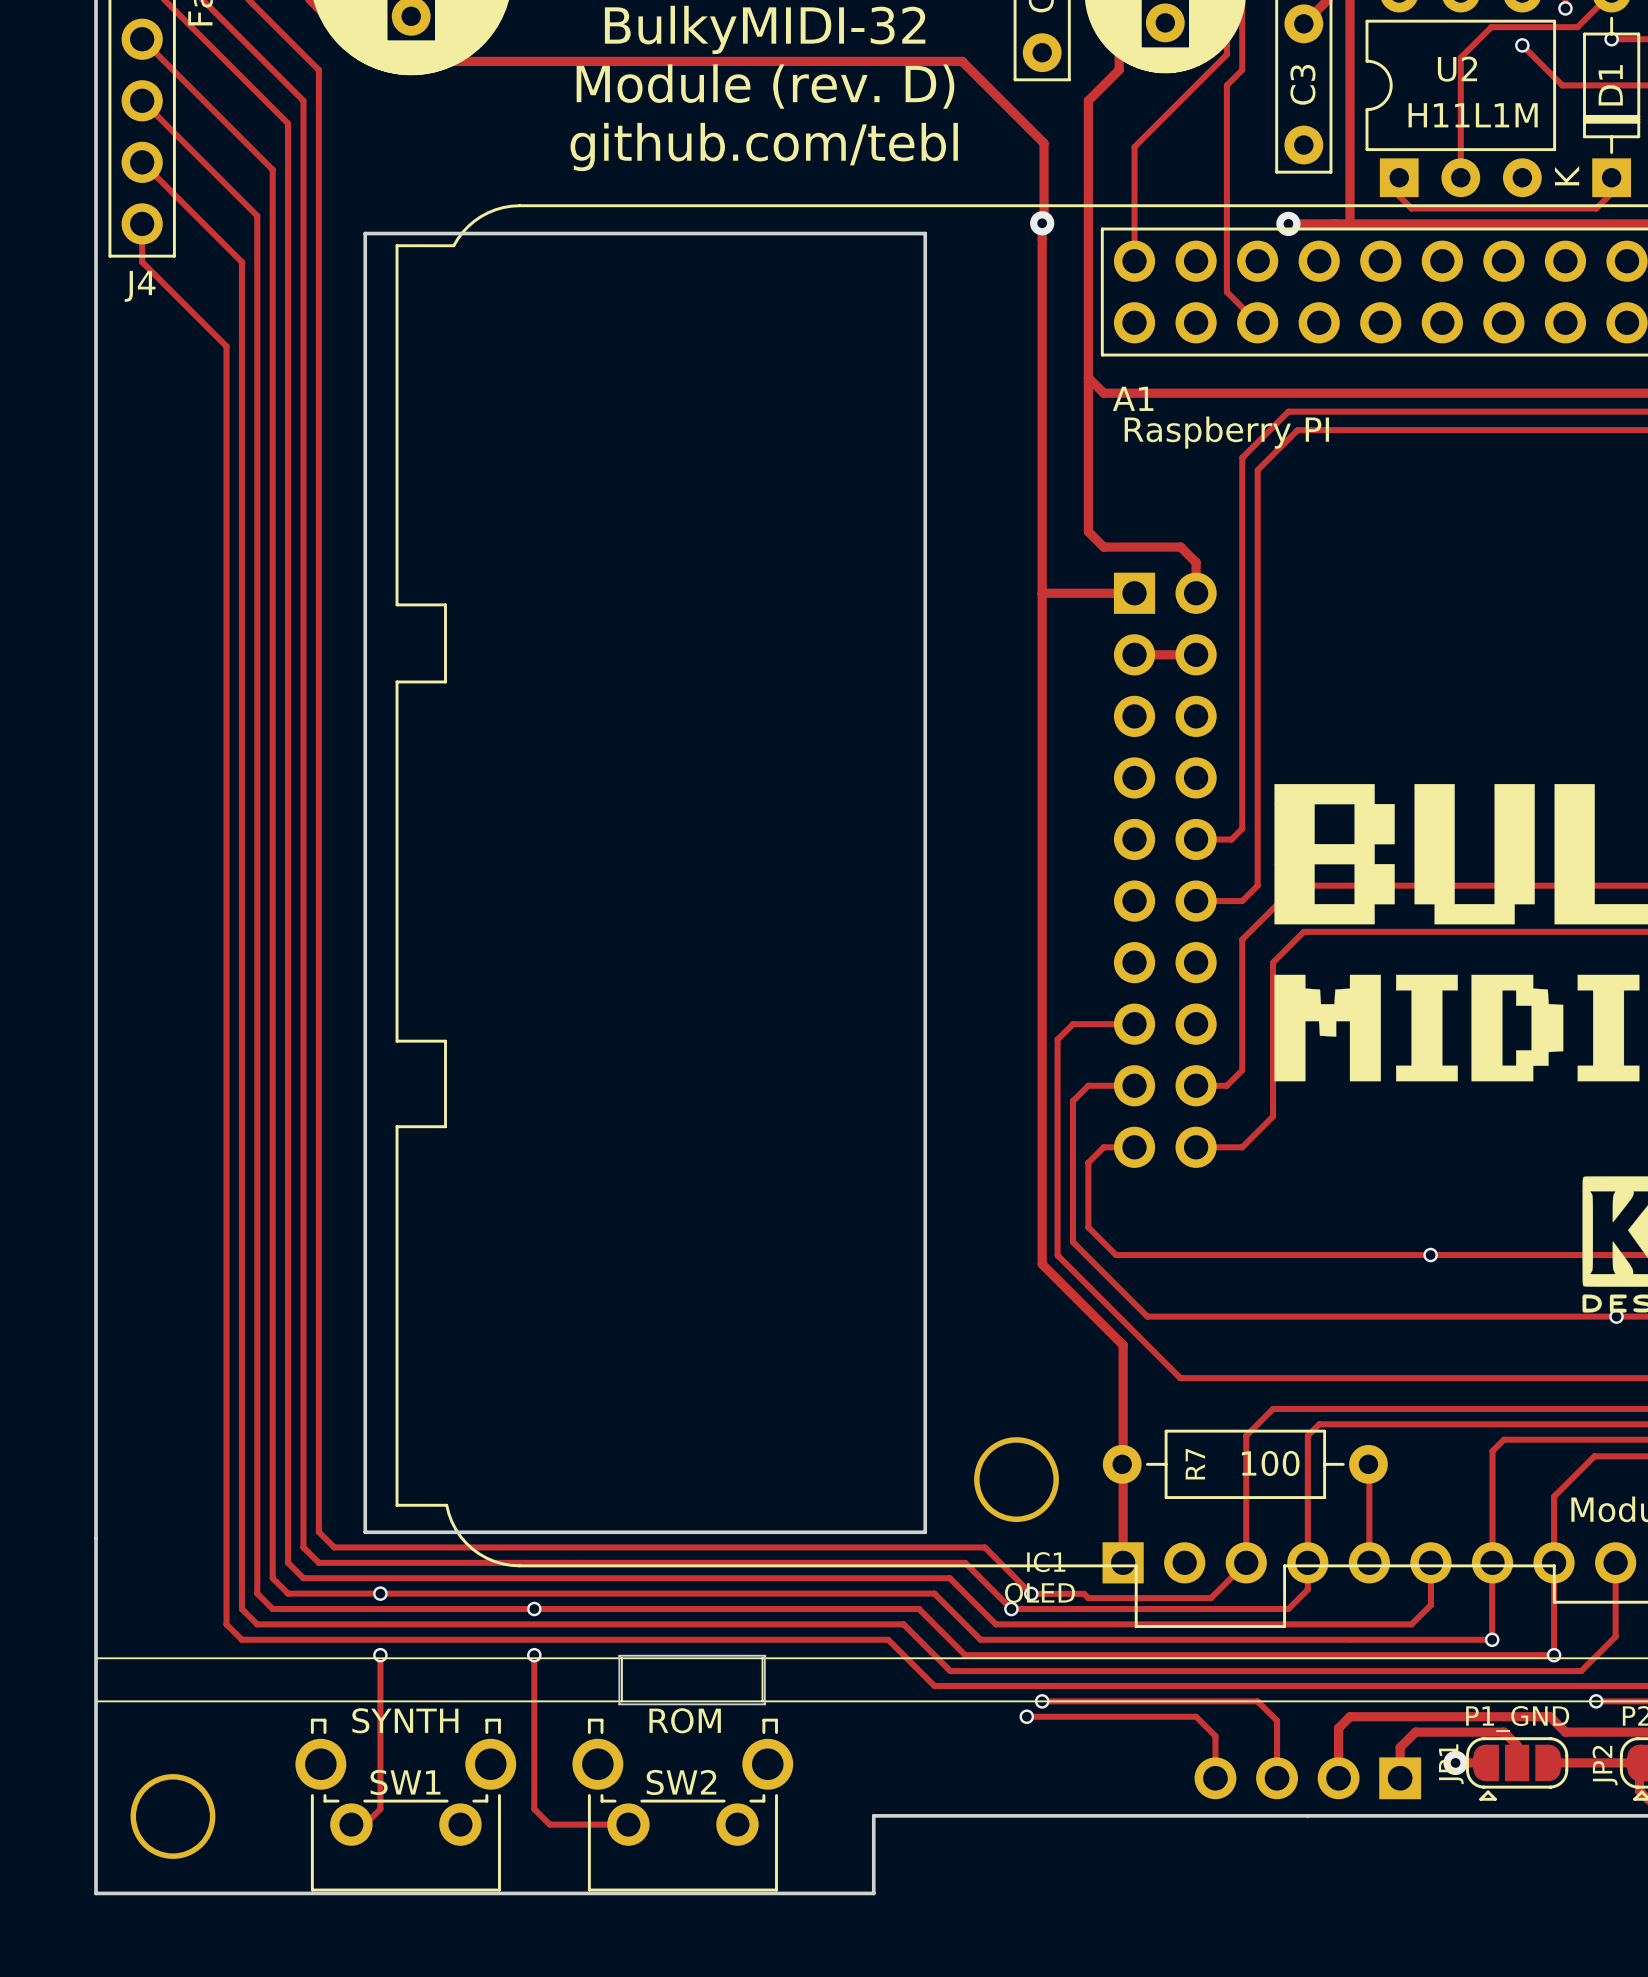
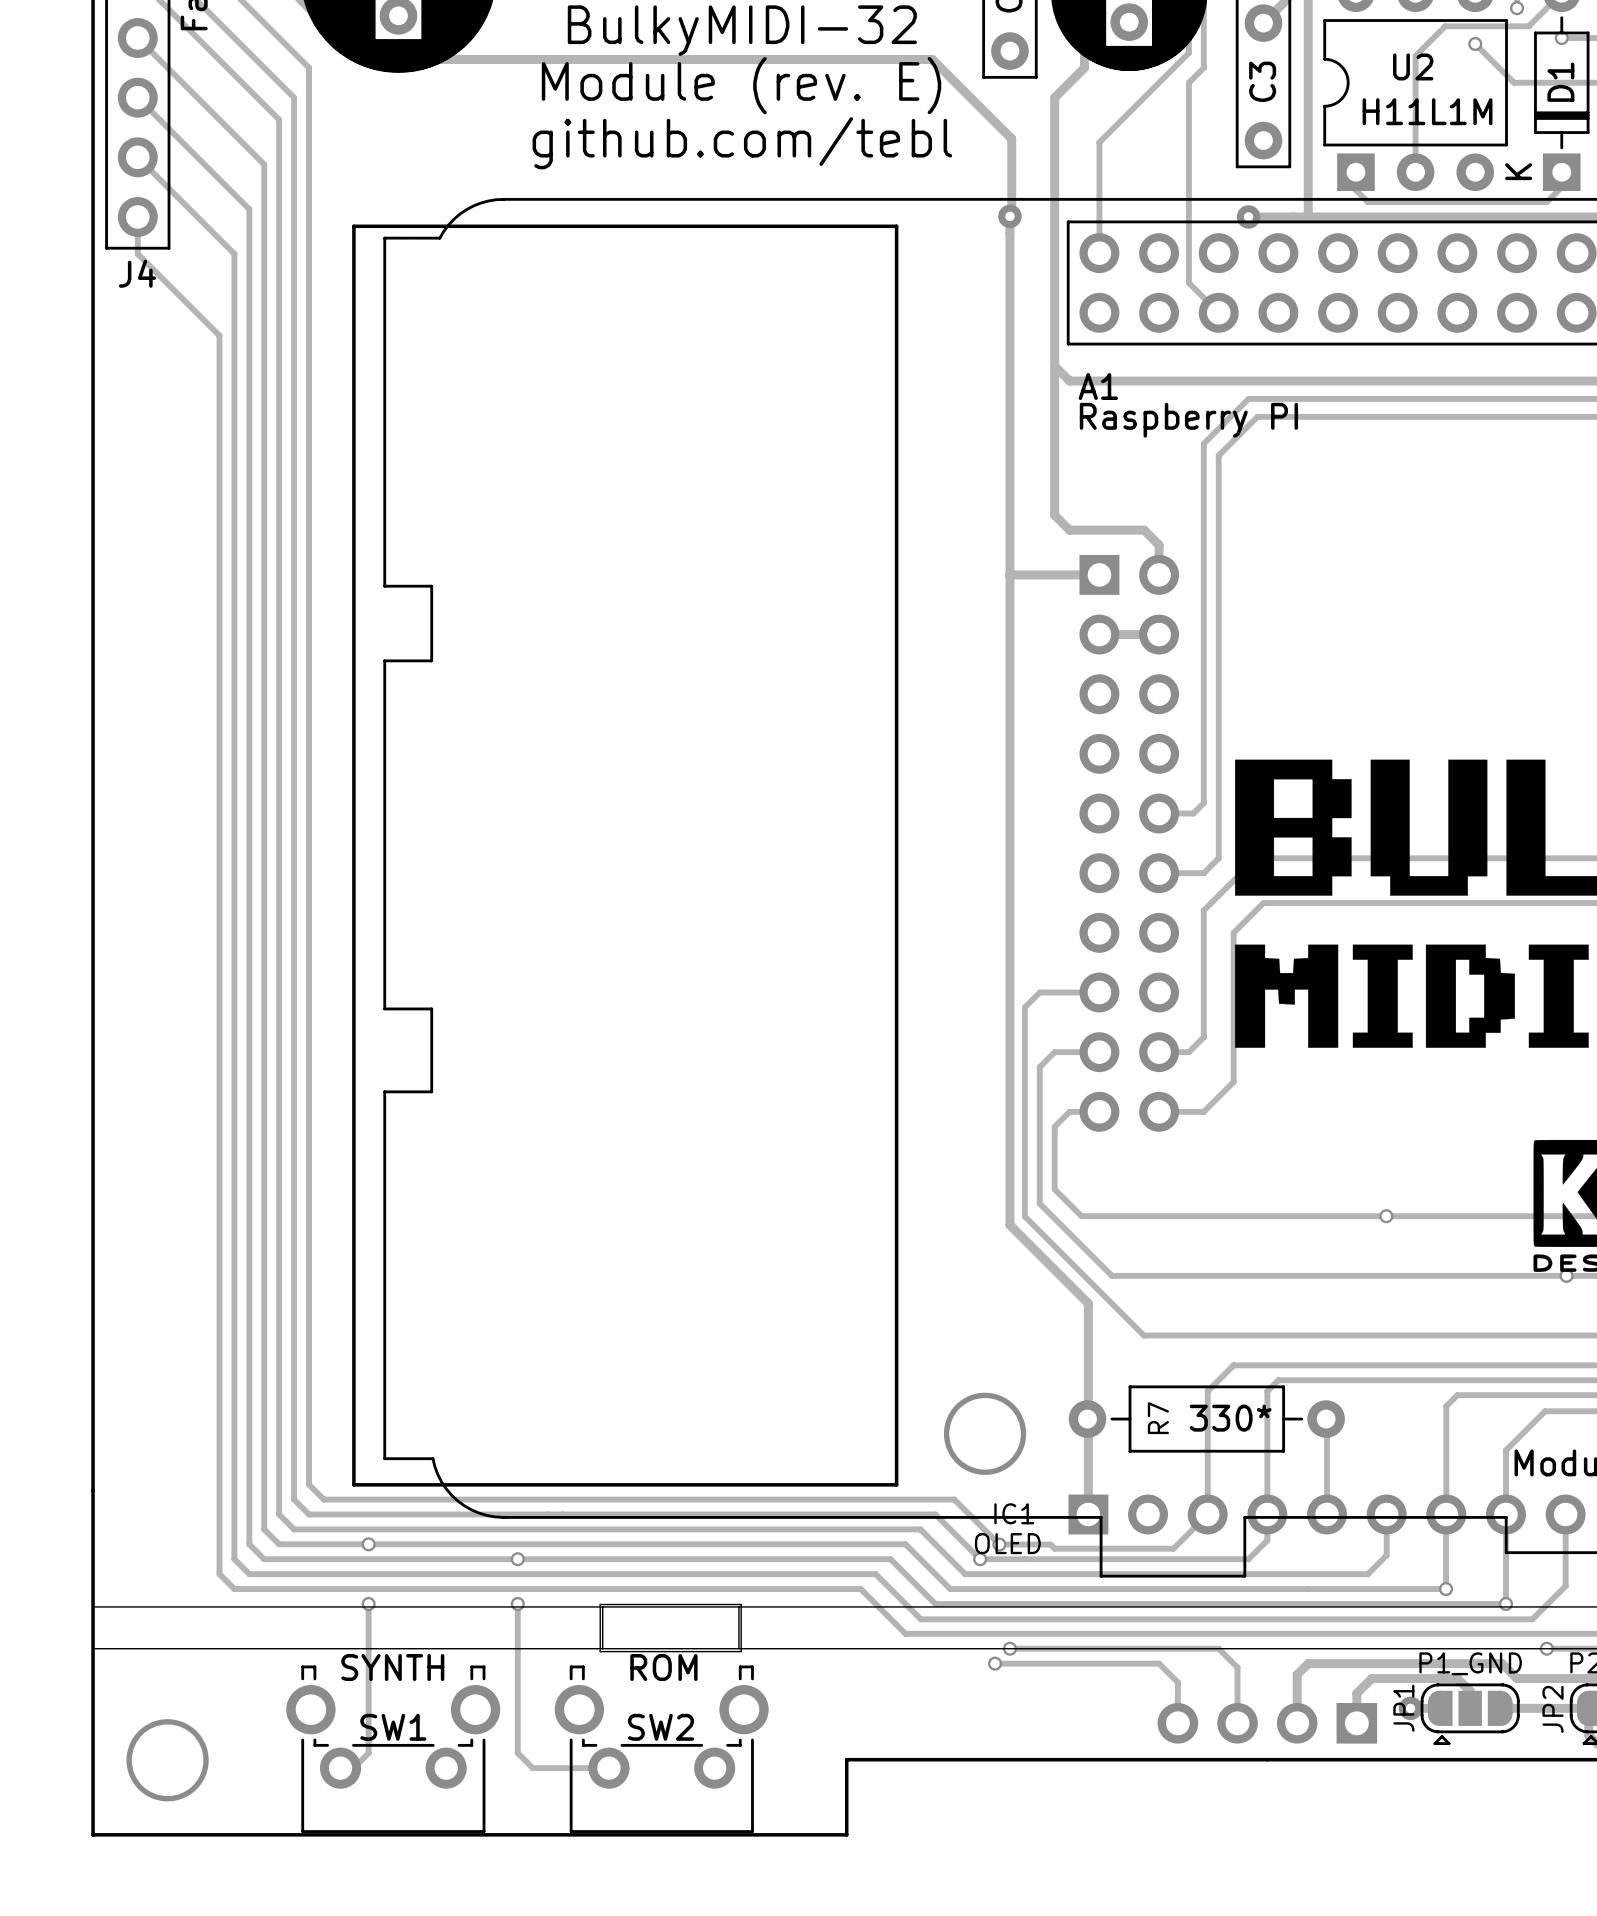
text: Module (rev. D) (765, 86) -> Module (rev. E) (741, 85)
R7 value: 100 (1270, 1463) -> 330* (1230, 1418)

